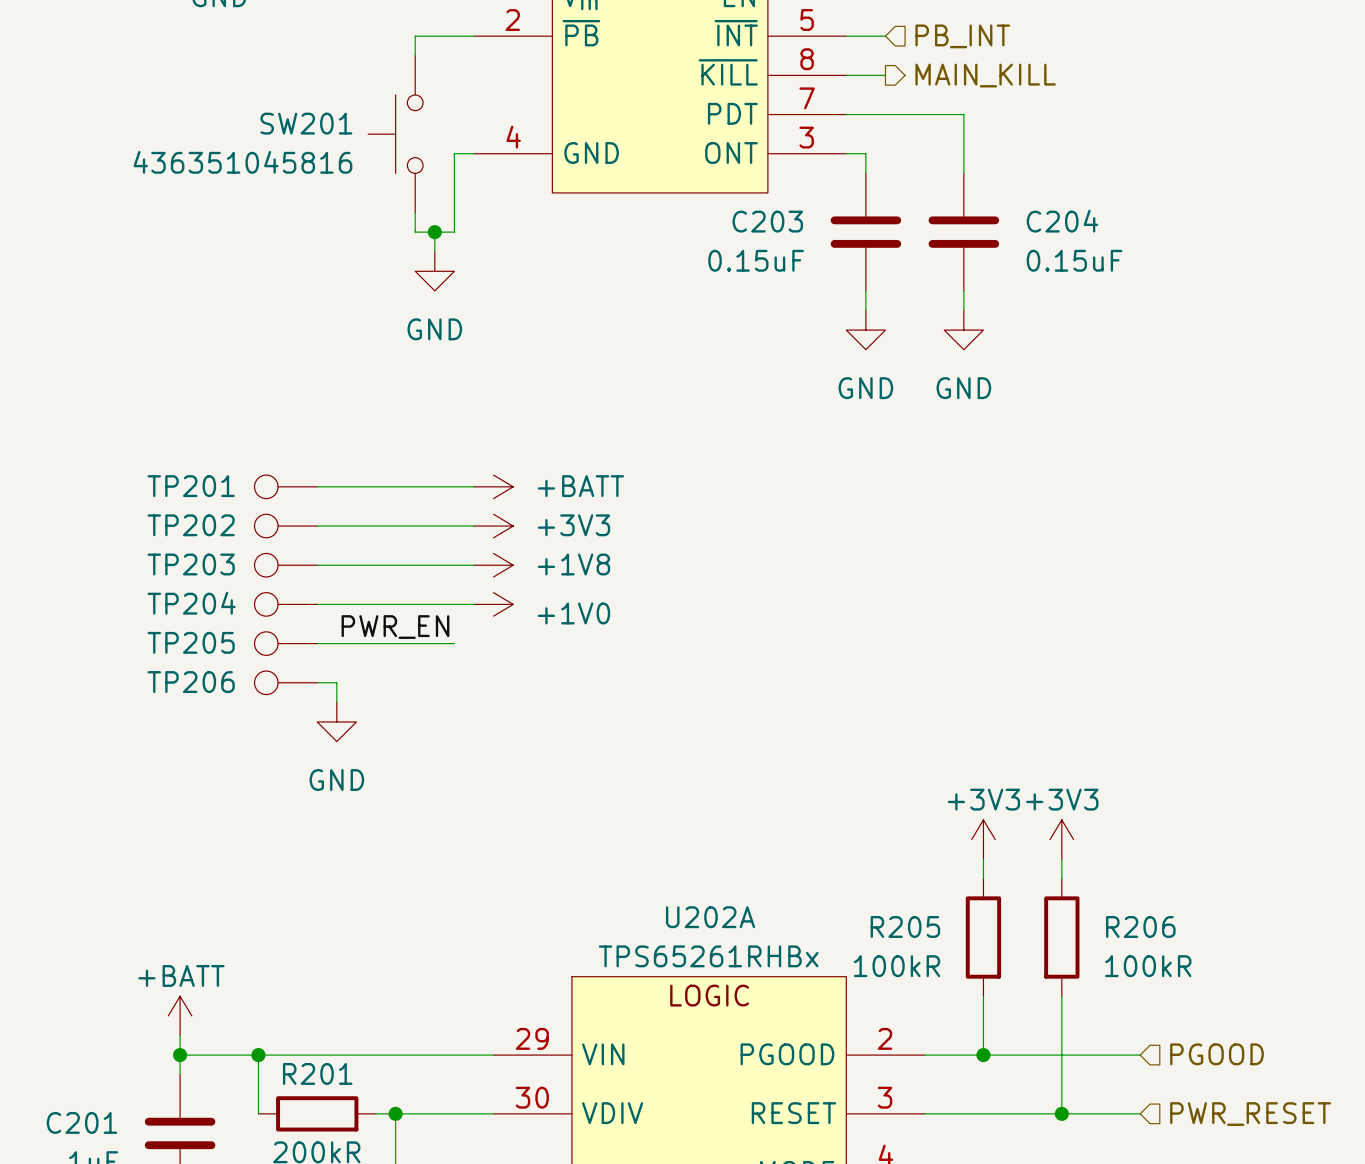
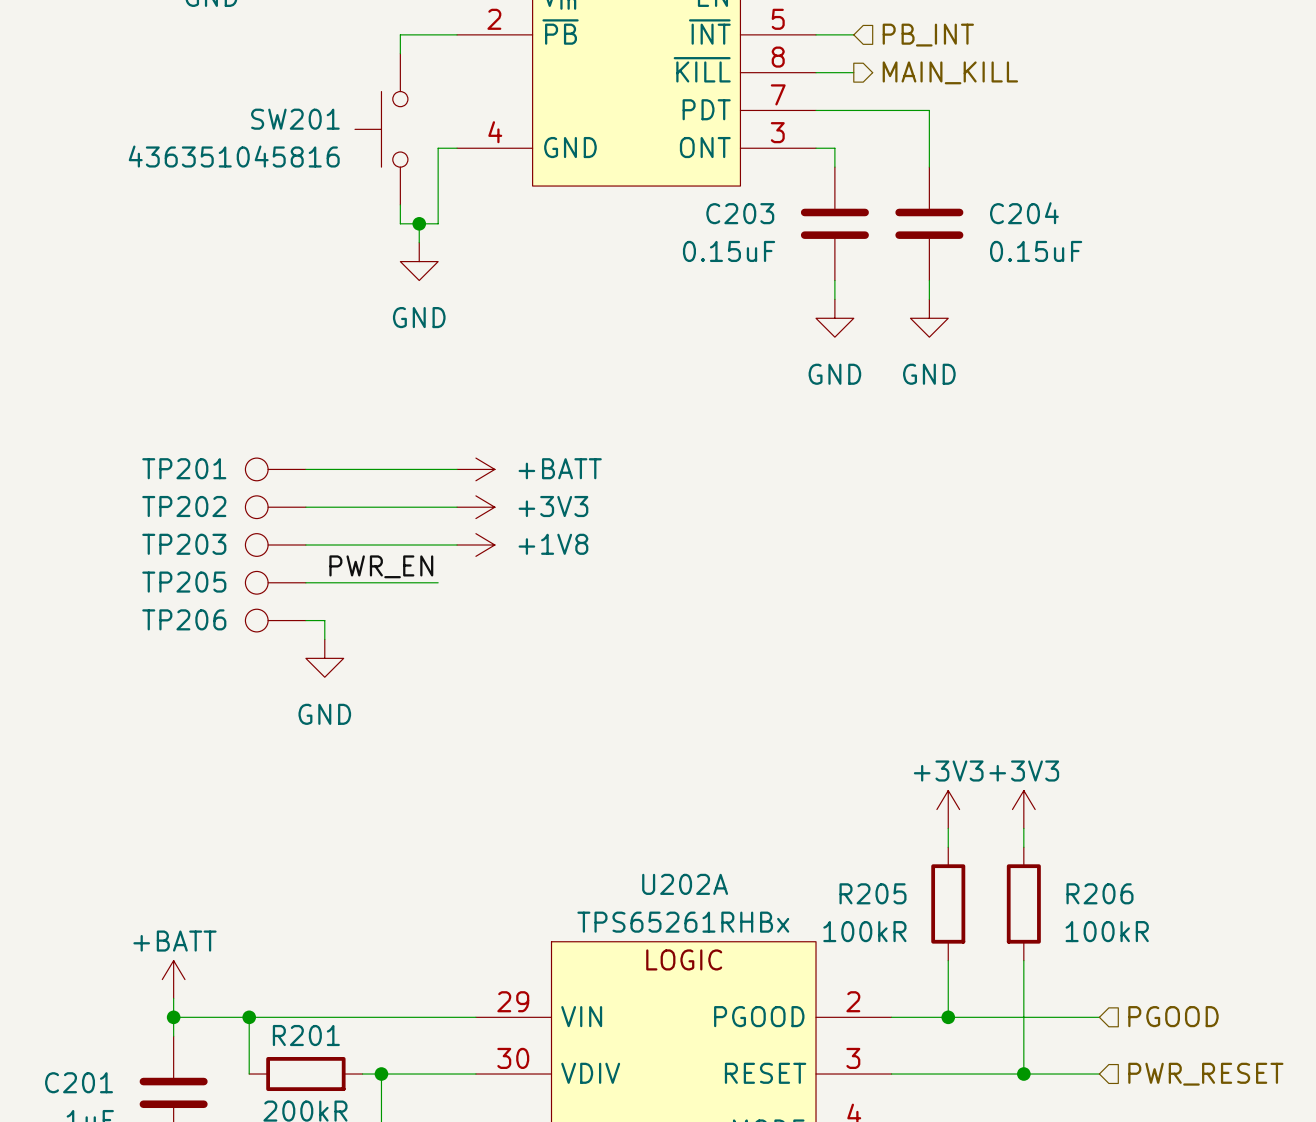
TP204 name: TP204 (191, 603) -> TP205 (184, 582)
wire: (454, 604) (474, 604) -> none
power symbol: +1V0 (493, 604) -> none
label position: PWR_EN (395, 627) -> PWR_EN (381, 566)
TP205 name: TP205 (191, 642) -> TP206 (184, 619)
wire: (336, 643) (454, 643) -> (324, 620) (324, 639)
TP206: (285, 682) -> none
wire: (317, 682) (336, 682) (336, 702) -> none
power symbol position: GND (336, 721) -> GND (324, 658)

